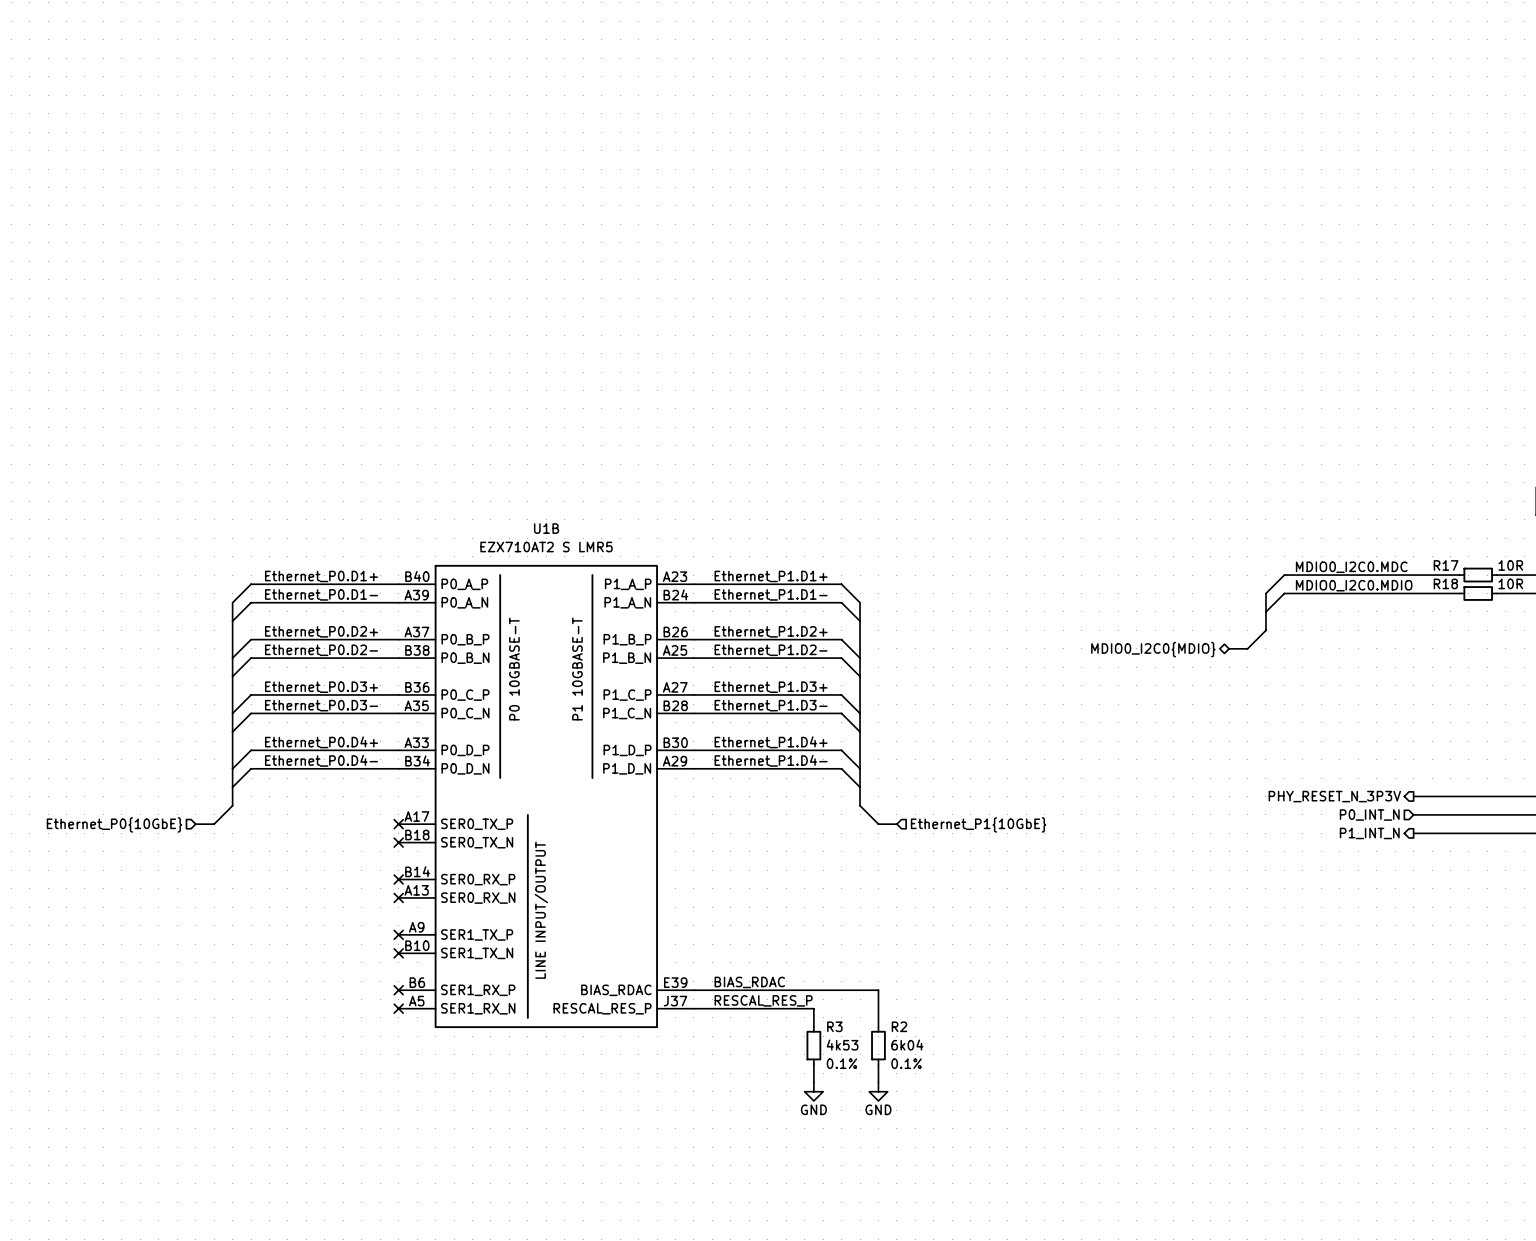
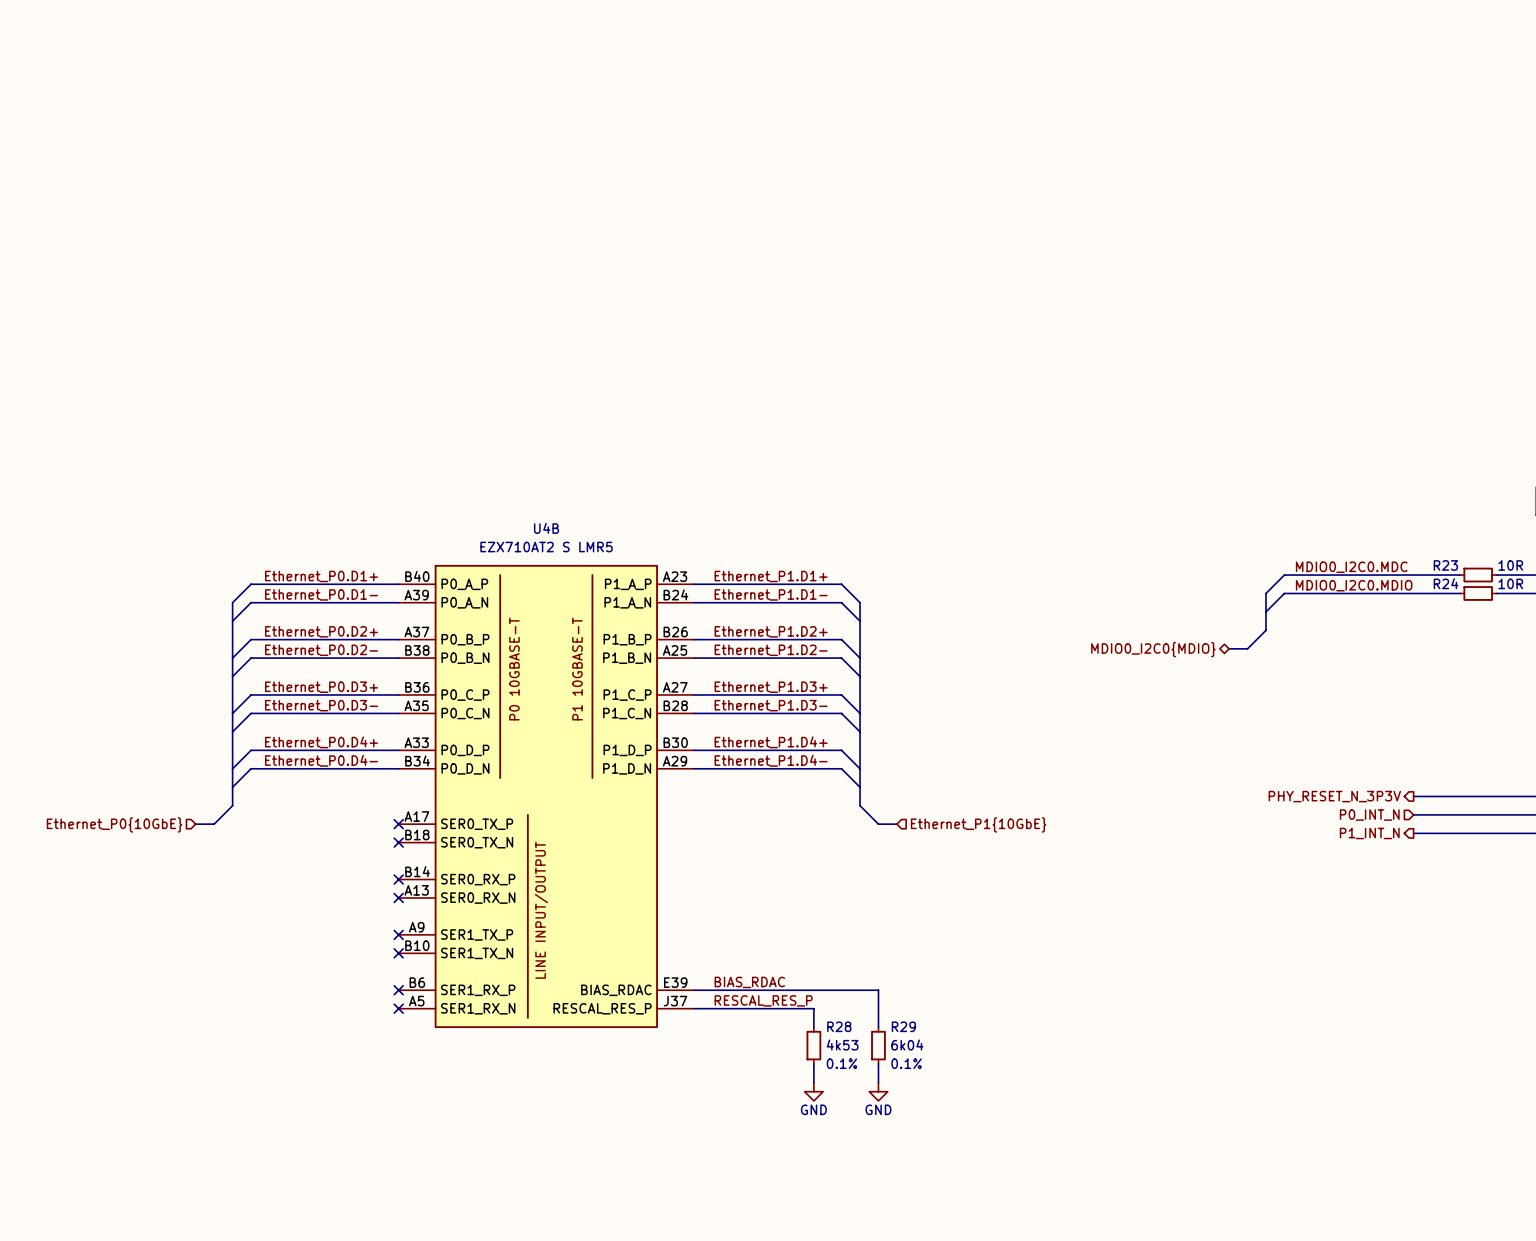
U1B name: U1B (546, 528) -> U4B (546, 528)
R17 name: R17 (1446, 565) -> R23 (1445, 565)
R18 name: R18 (1445, 583) -> R24 (1446, 583)
R3 name: R3 (834, 1026) -> R28 (839, 1026)
R2 name: R2 (899, 1026) -> R29 (903, 1026)

